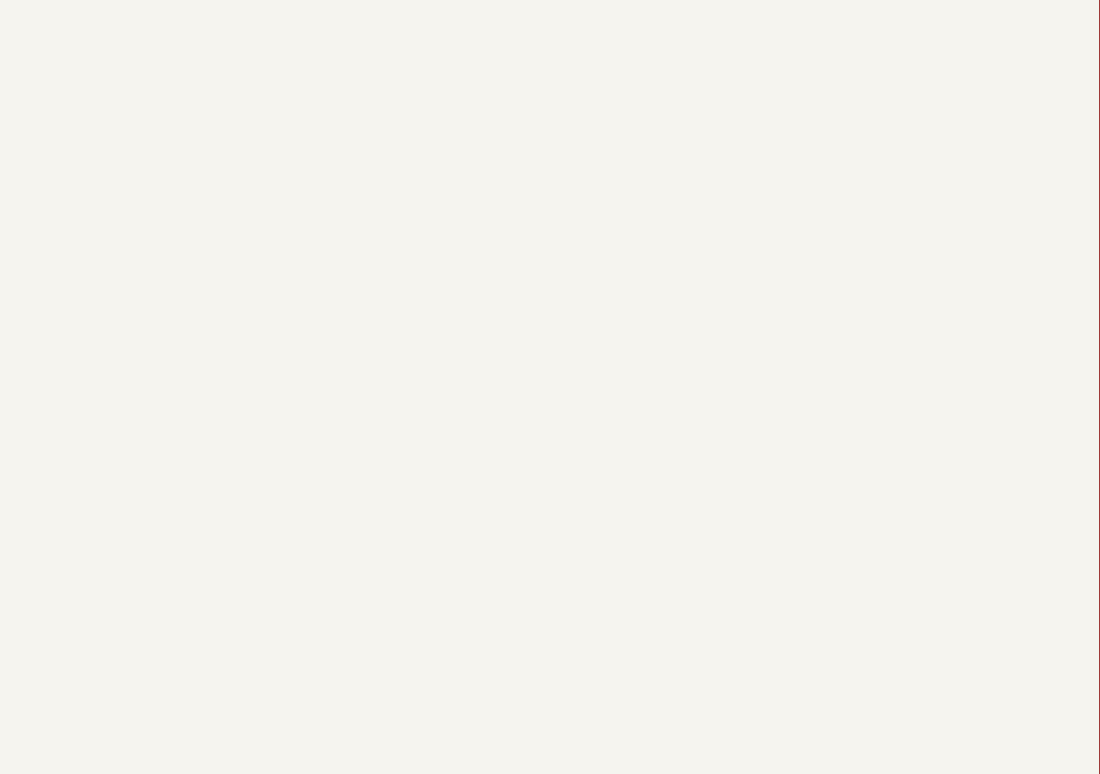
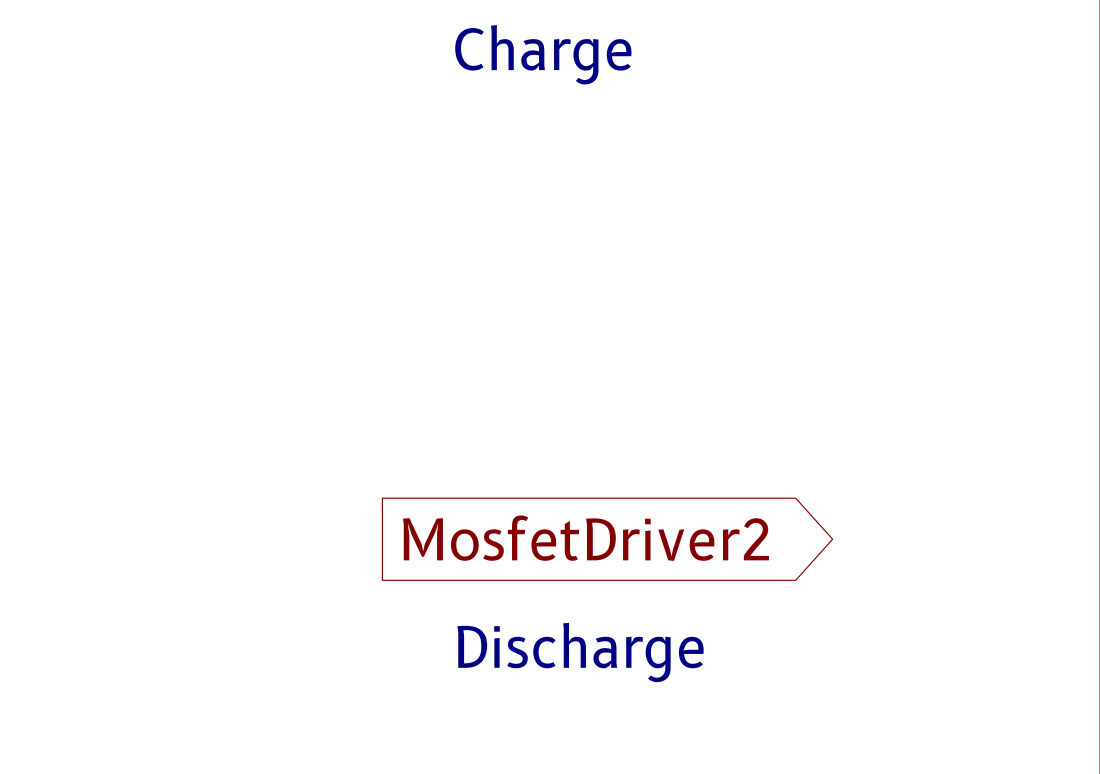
text: none -> Charge (543, 54)
global label: none -> MosfetDriver2 (585, 538)
text: none -> Discharge (580, 652)

